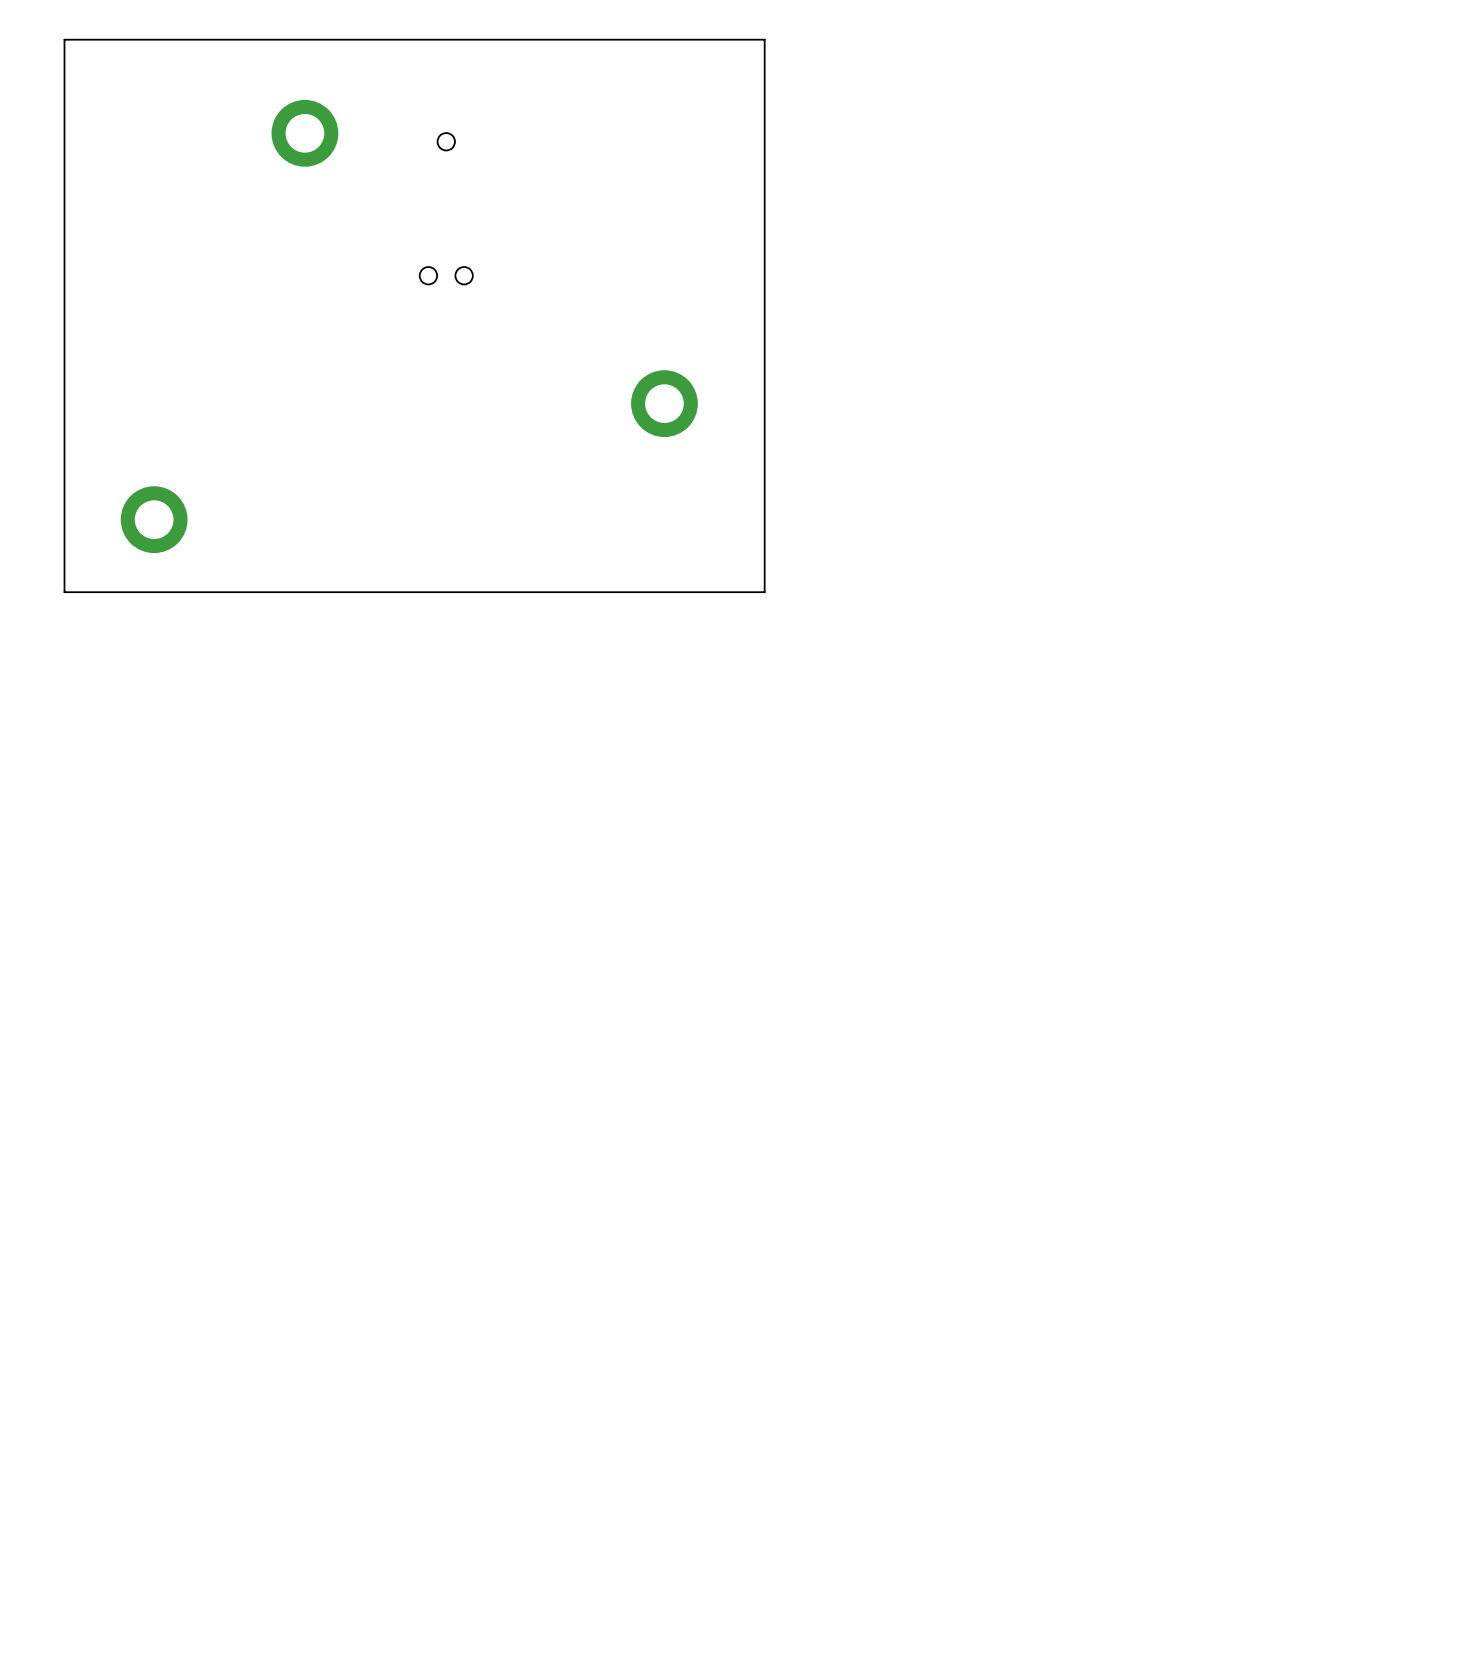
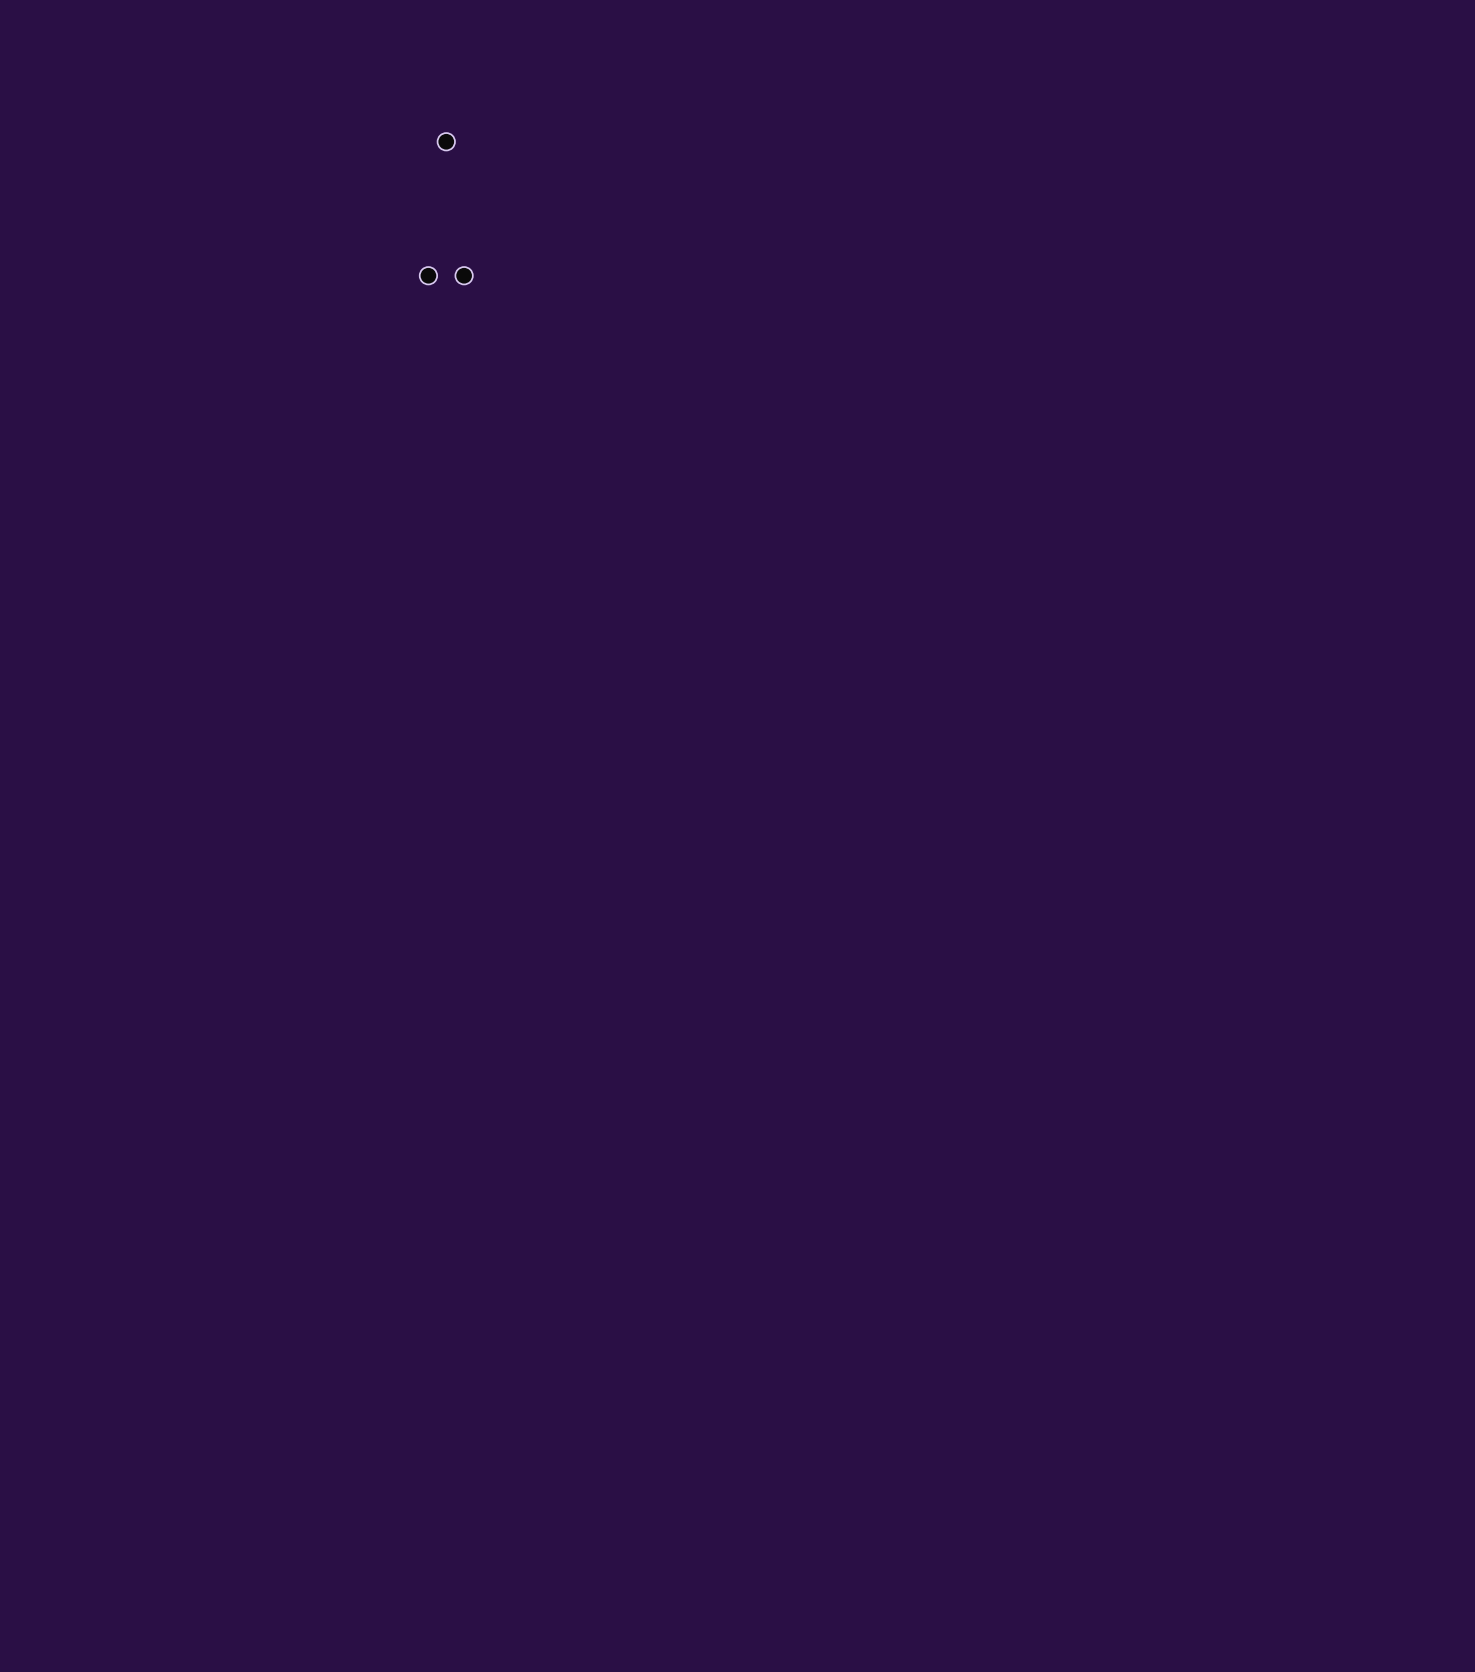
board edge: (764, 39) (64, 39) (64, 592) (764, 592) (764, 39) -> none
part: (304, 133) -> none
part: (664, 403) -> none
part: (154, 519) -> none

